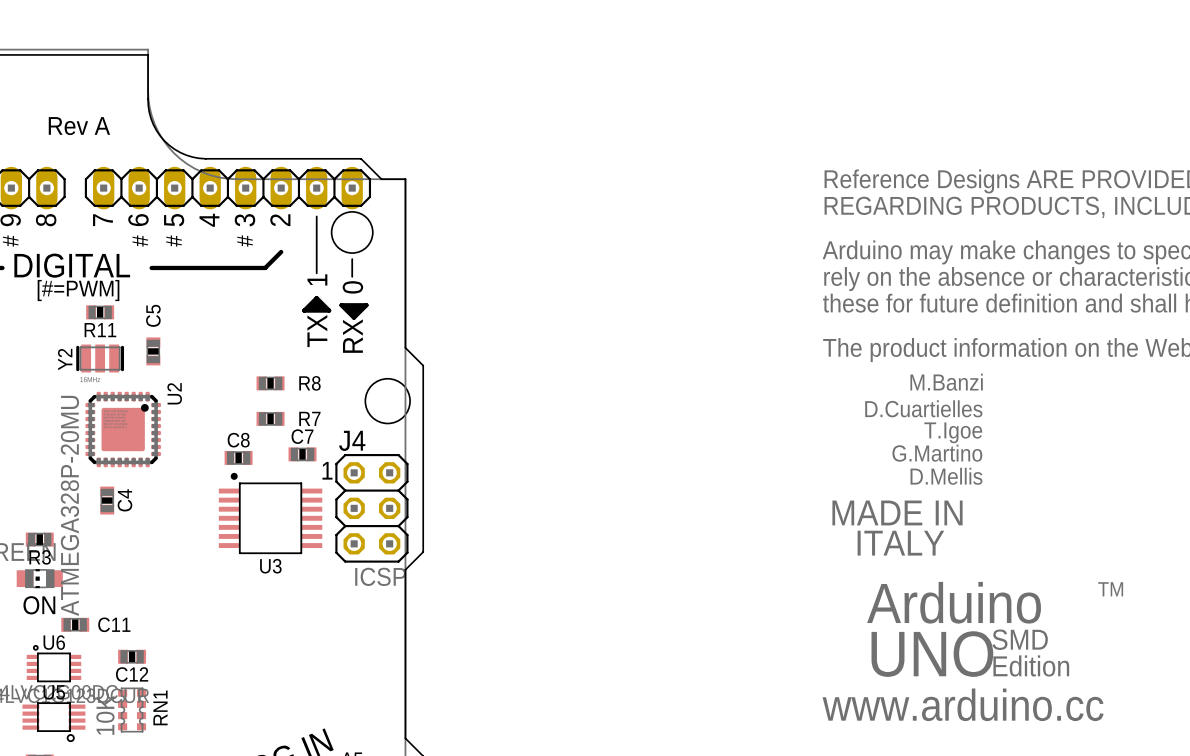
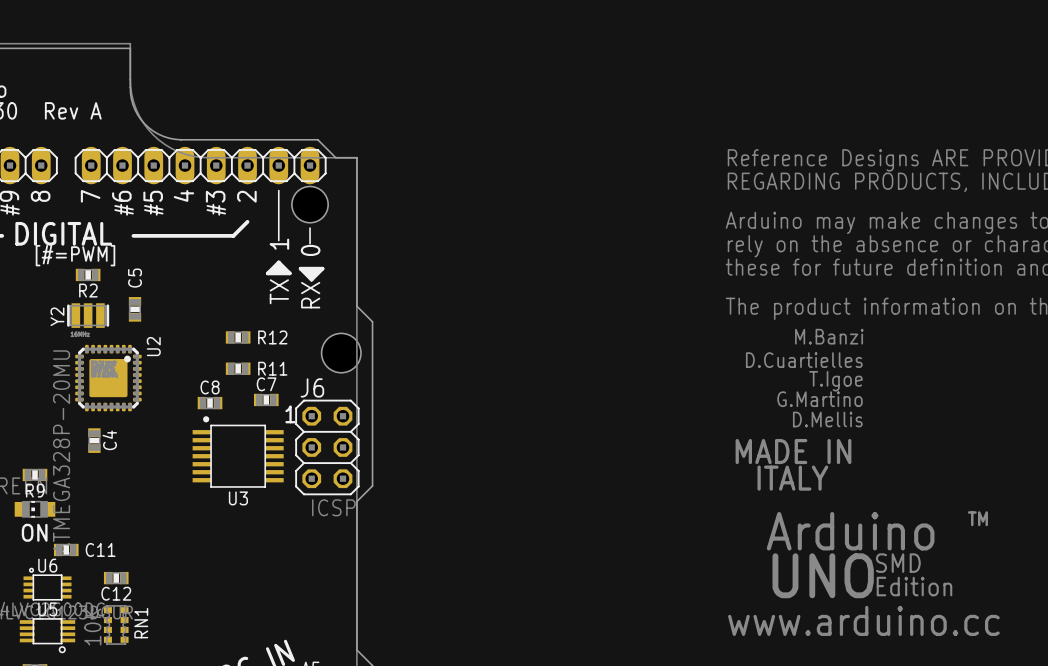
R11 name: R11 (100, 330) -> R2 (88, 290)
R8 name: R8 (309, 383) -> R12 (272, 337)
R7 name: R7 (309, 418) -> R11 (272, 368)
J4 name: J4 (352, 440) -> J6 (312, 387)
R3 name: R3 (40, 557) -> R9 (35, 490)

